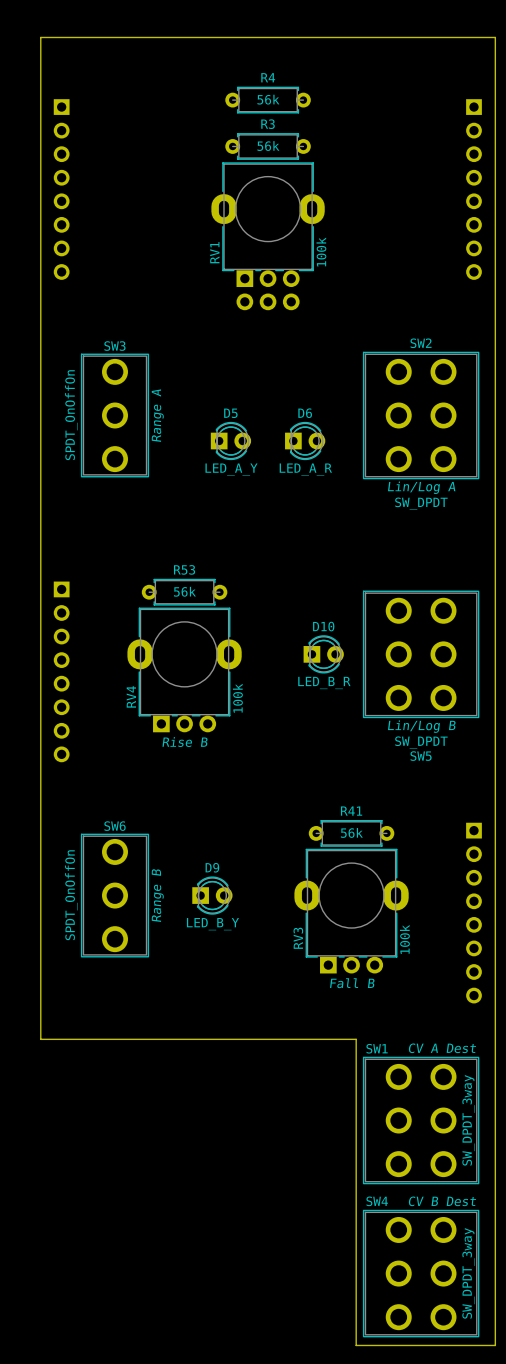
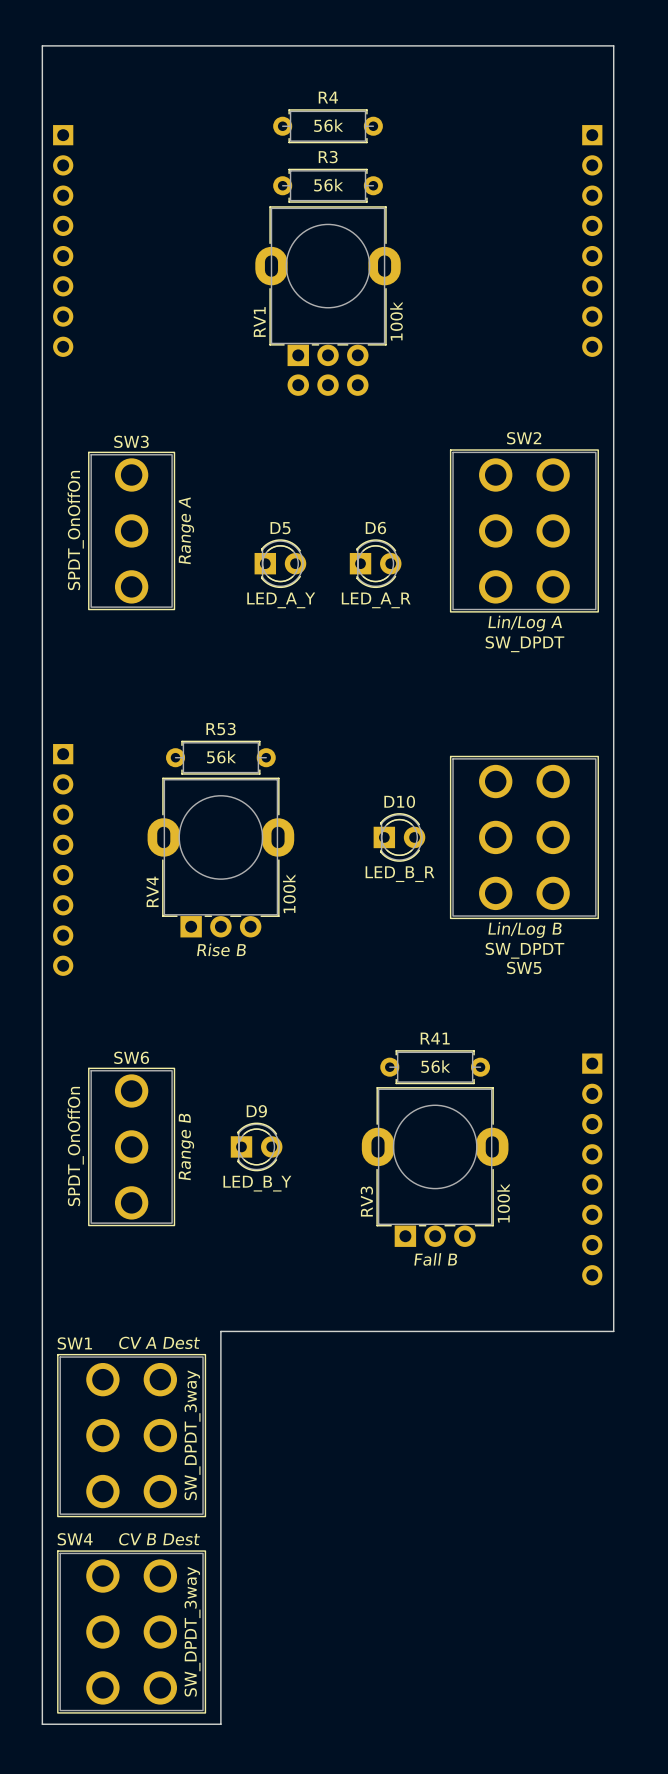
board edge: (45, 37) (40, 37) (40, 1039) (184, 1039) -> (42, 45) (42, 1724) (220, 1724) (220, 1331)
board edge: (490, 37) (495, 37) (495, 1345) (356, 1345) (356, 1039) -> (613, 45) (613, 1331) (441, 1331)
SW1 position: (421, 1120) -> (131, 1435)
SW4 position: (421, 1273) -> (131, 1631)

